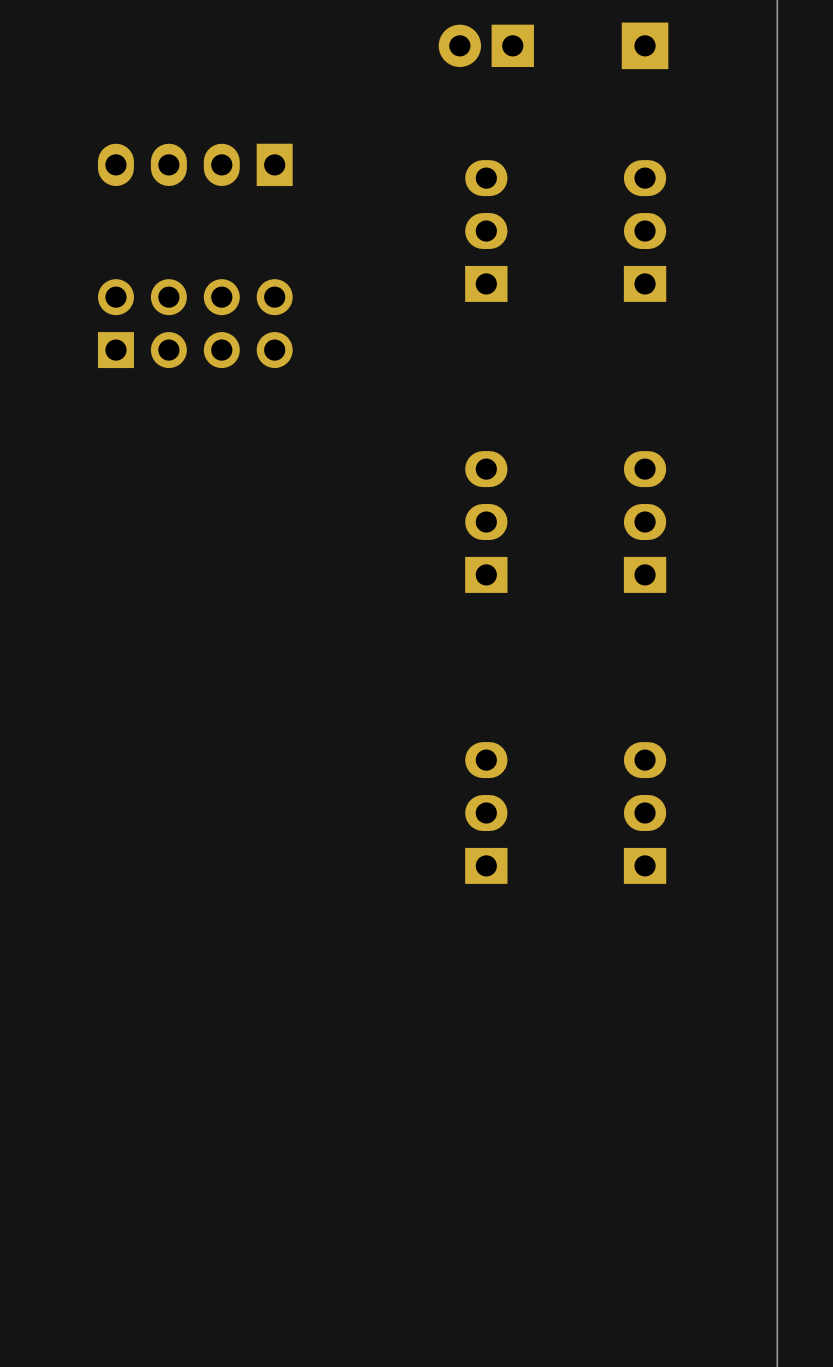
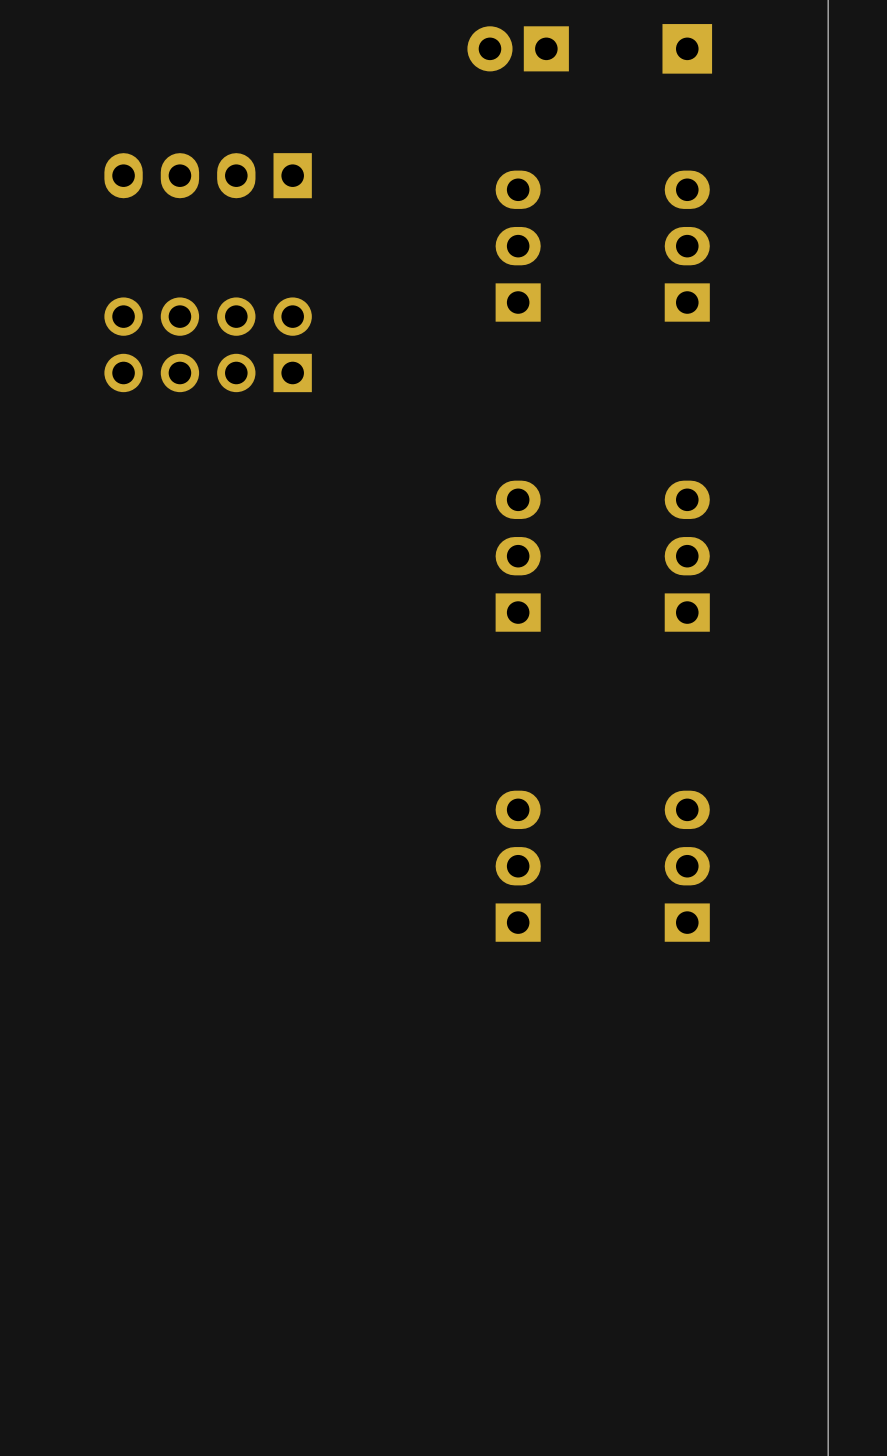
part footprint: [97, 279, 293, 369] -> [104, 297, 312, 393]

